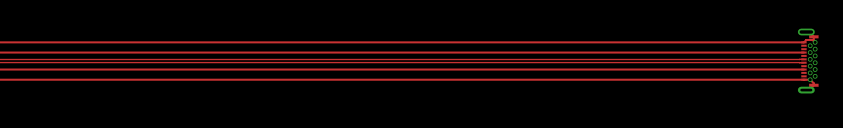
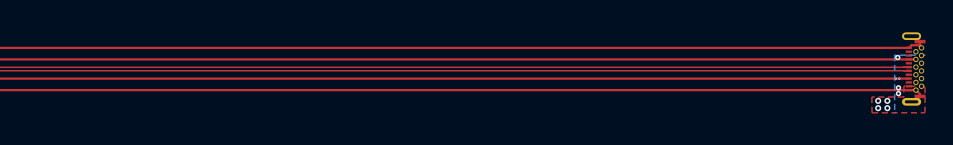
bottom zone outline: none -> (925, 55) (894, 55) (895, 113)
via: none -> (897, 57)
top track: none -> (915, 59) (908, 59)
via: none -> (895, 78)
via: none -> (899, 78)
top zone outline: none -> (925, 86) (925, 112) (872, 112) (871, 97) (903, 97) (903, 86) (925, 86)
via: none -> (898, 87)
via: none -> (898, 93)
via: none -> (878, 100)
via: none -> (887, 100)
via: none -> (878, 108)
via: none -> (887, 108)

